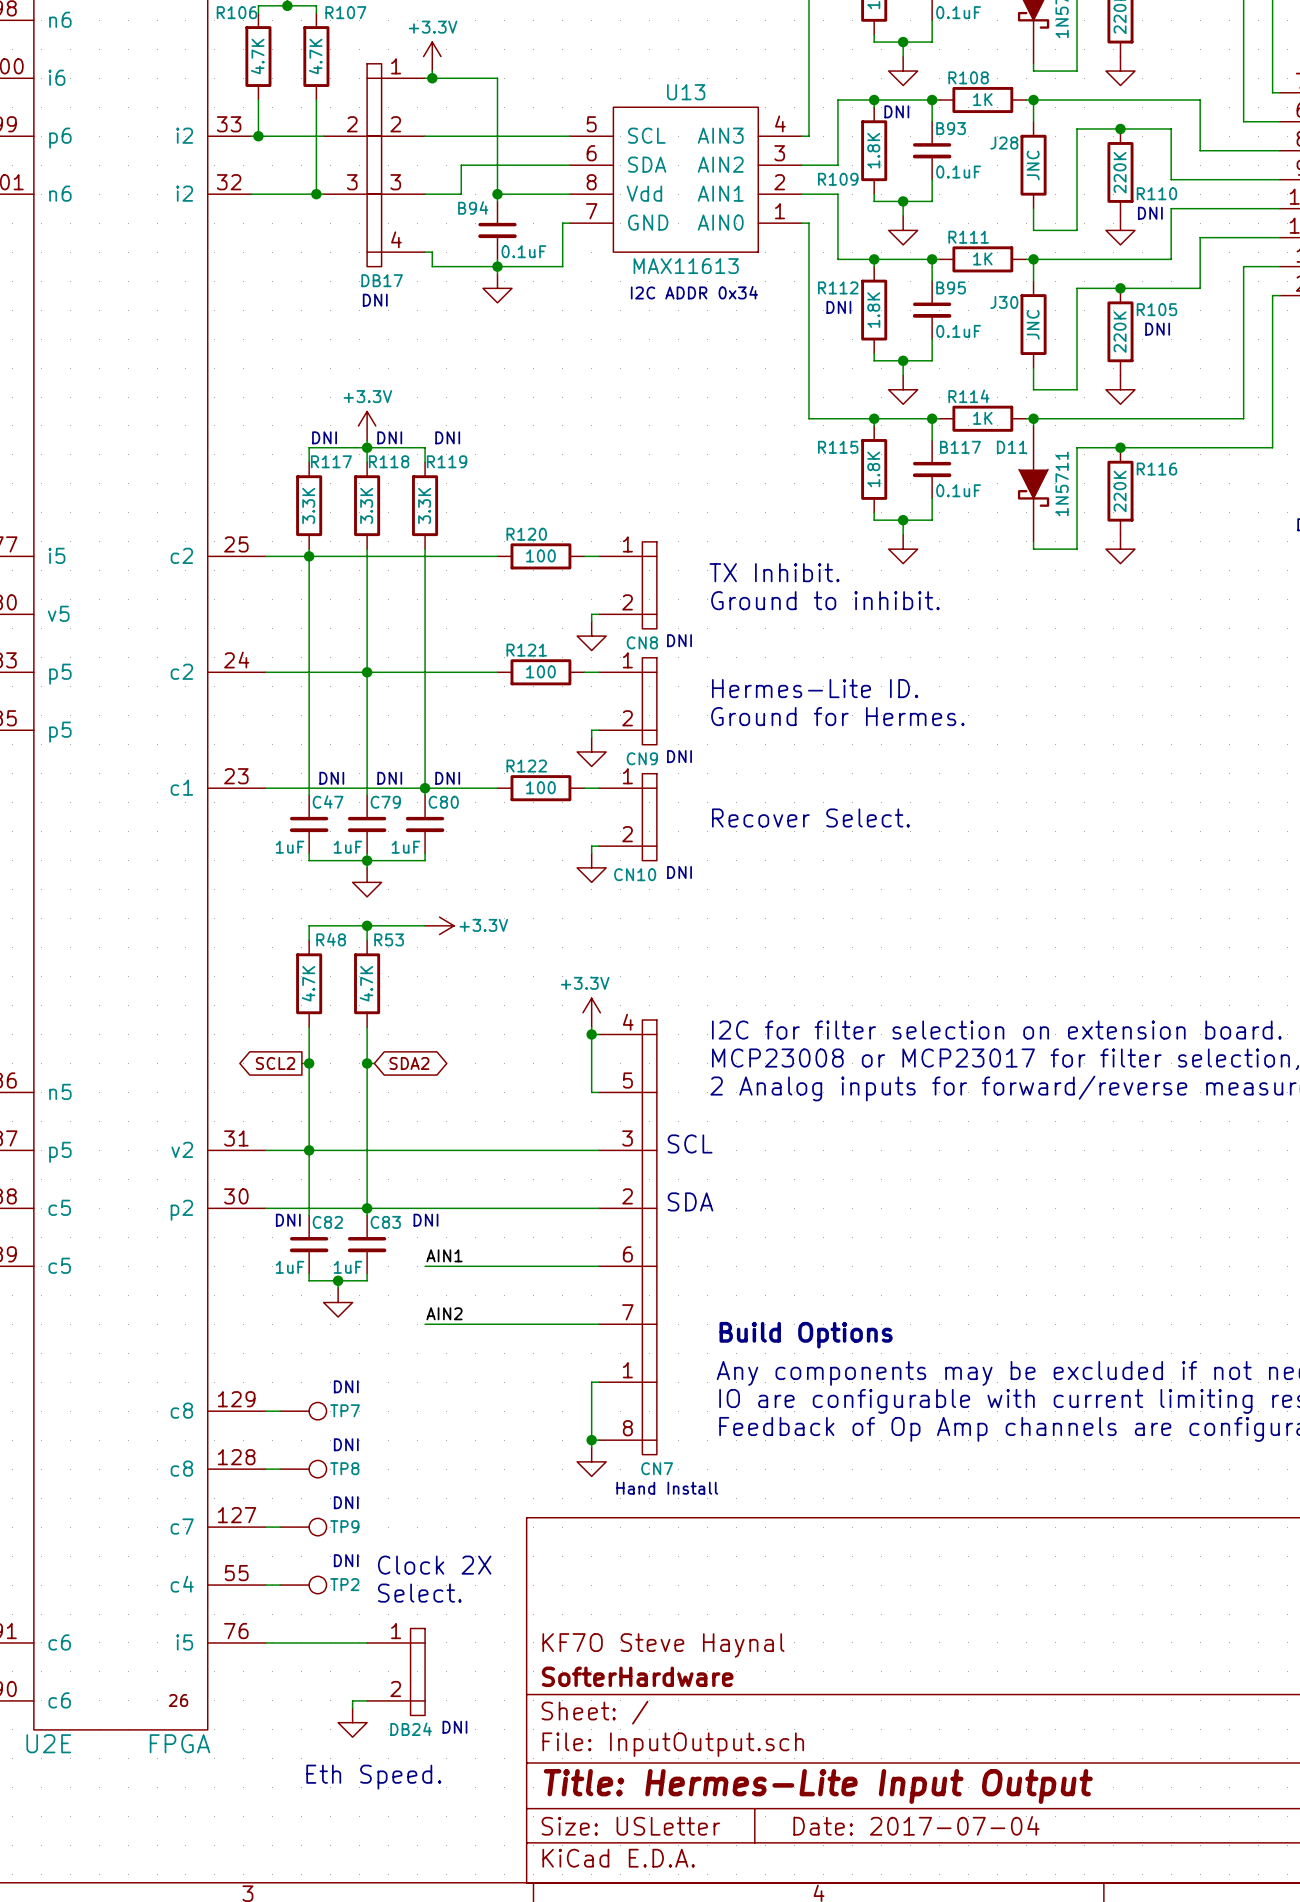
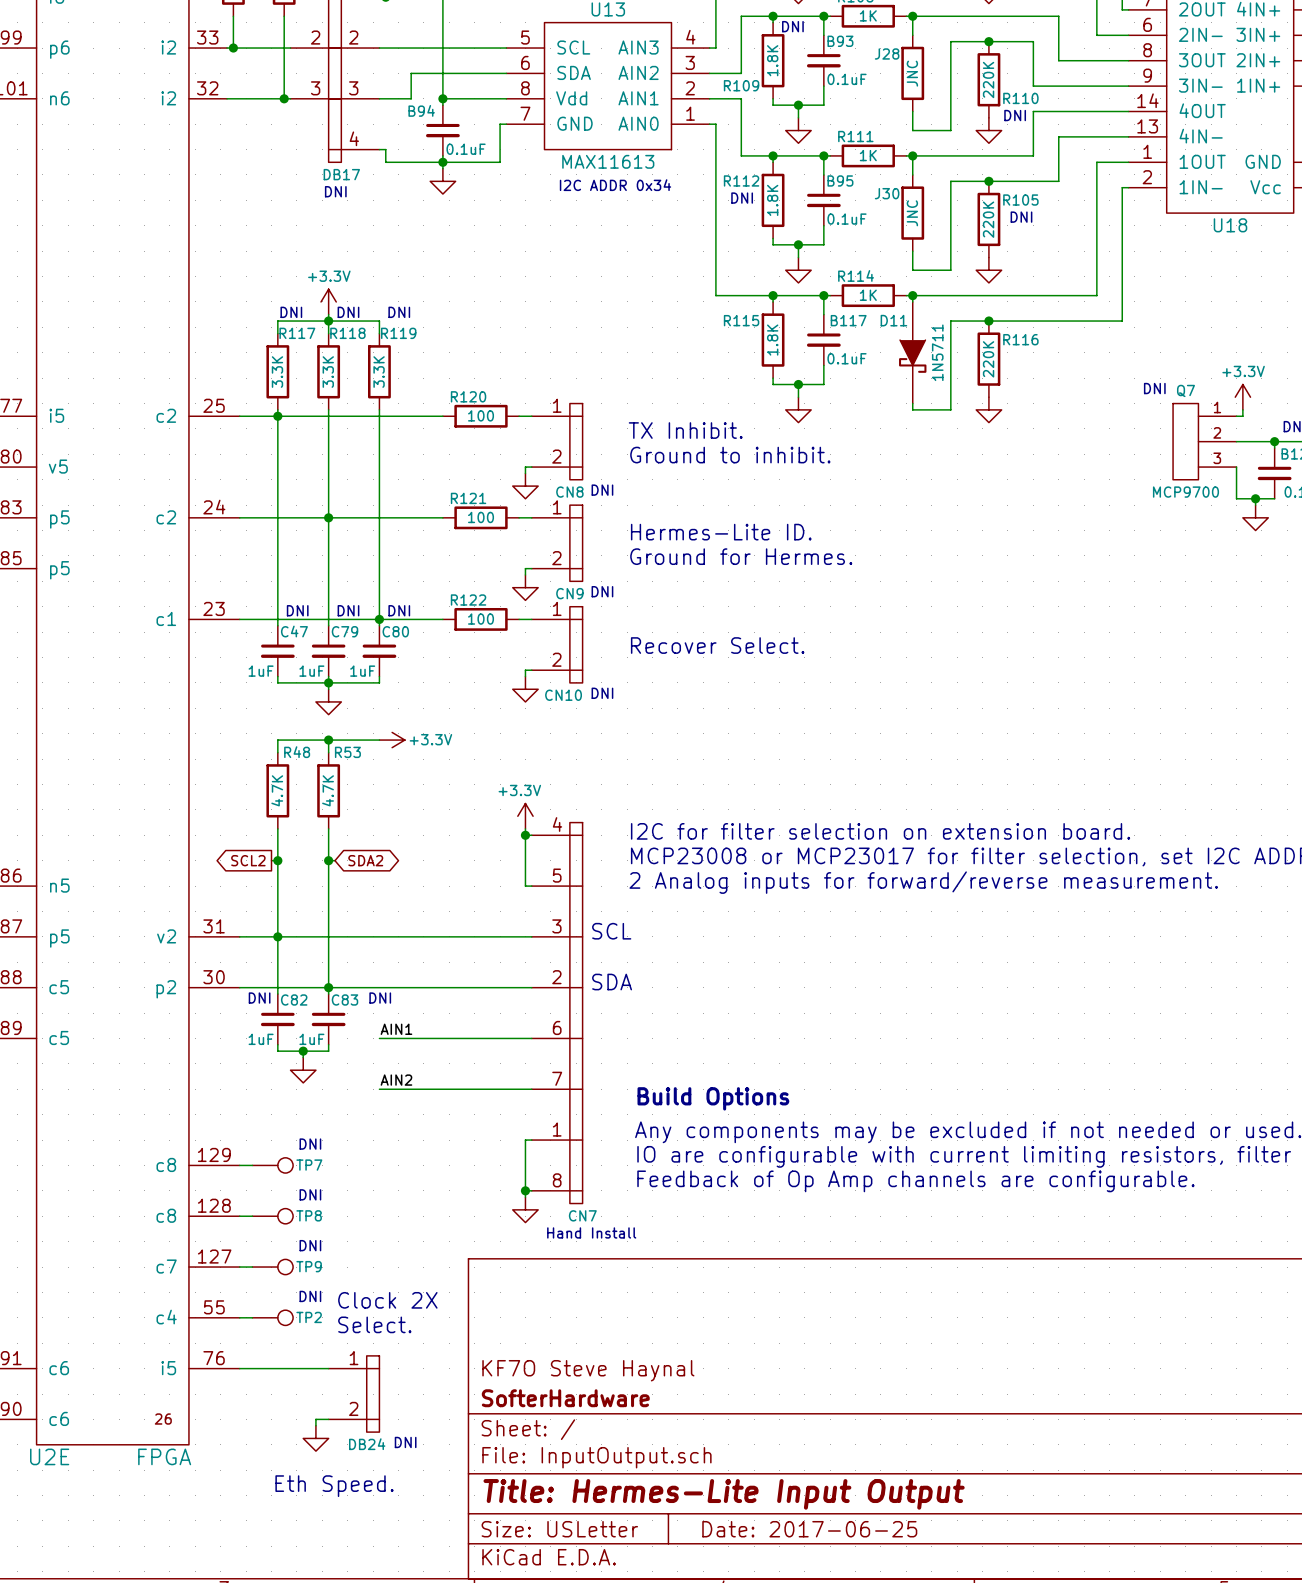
title block: Date: 2017-07-04 (916, 1825) -> Date: 2017-06-25 (809, 1529)

